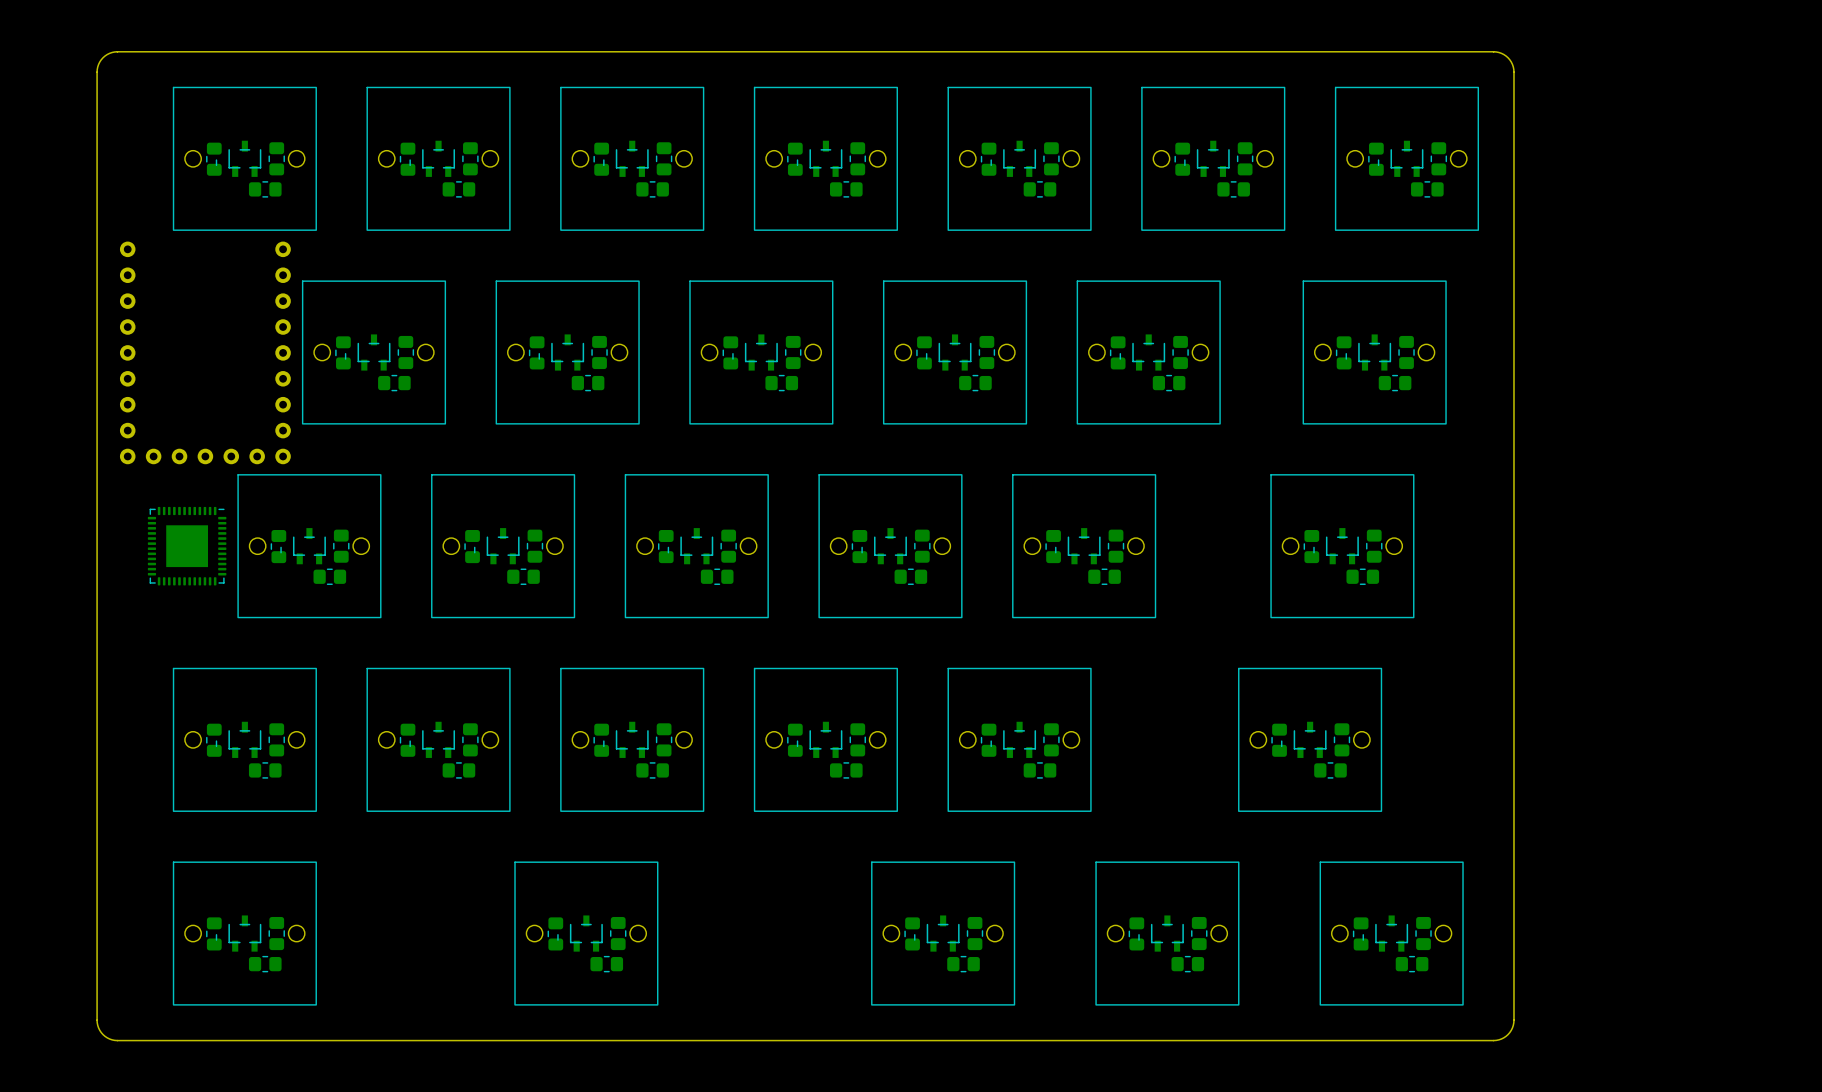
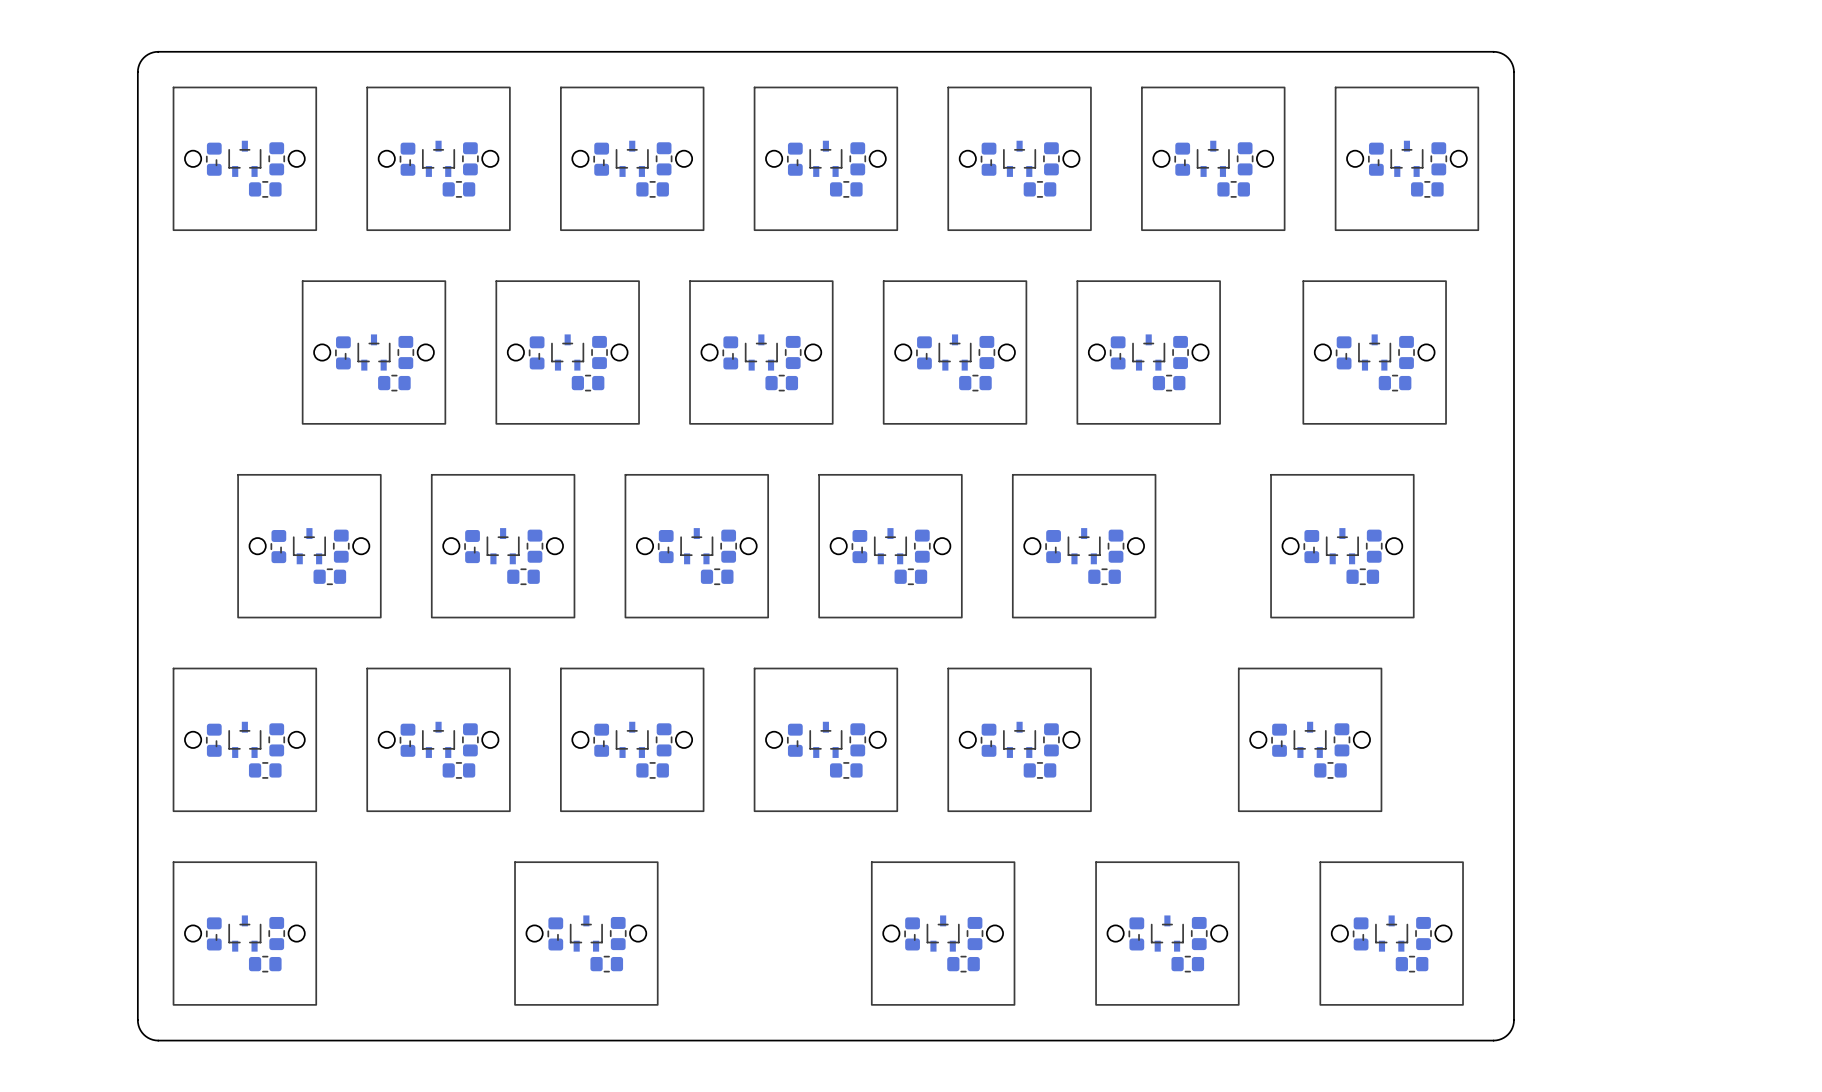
board edge: (158, 51) (112, 52) (101, 59) (97, 72) (97, 1020) (101, 1032) (112, 1039) (158, 1040) -> (158, 51) (150, 53) (143, 57) (139, 64) (137, 72) (137, 1020) (139, 1027) (143, 1034) (150, 1039) (158, 1040)
part: (205, 352) -> none
part: (187, 546) -> none

